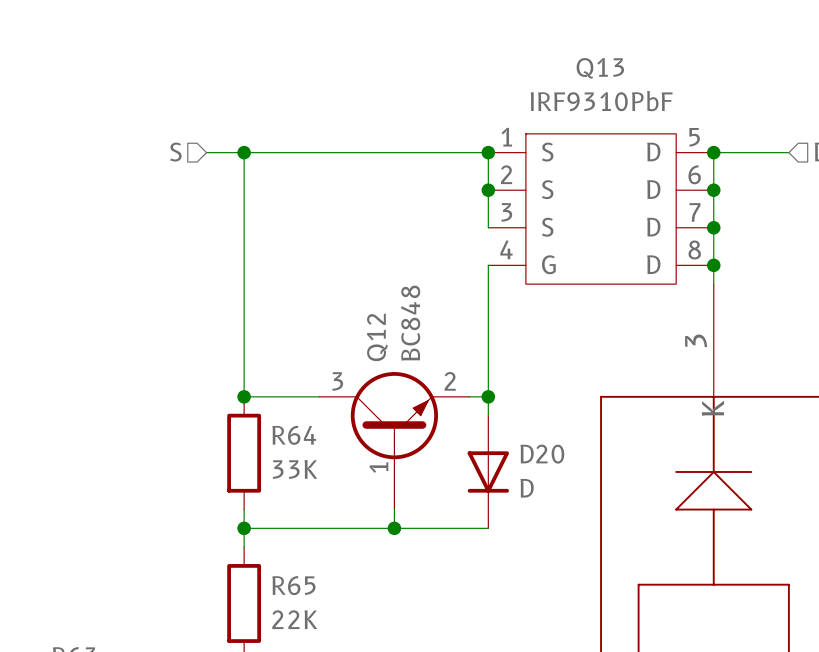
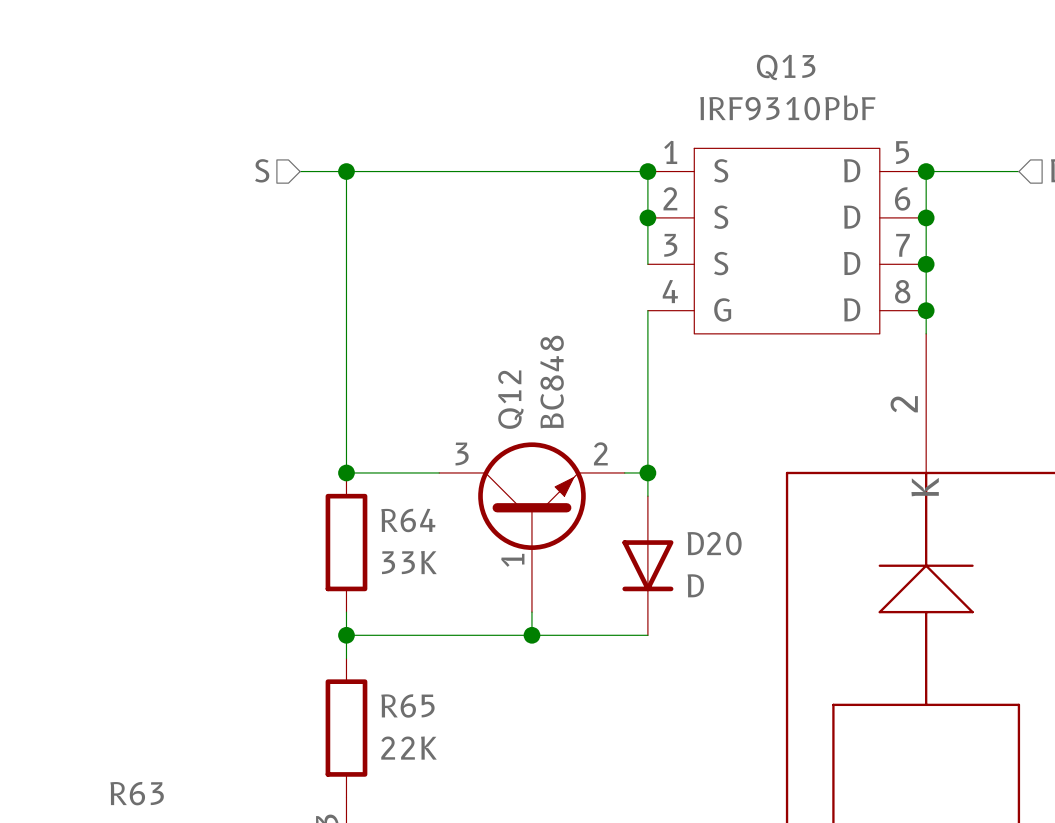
part pin number: 3 (696, 340) -> 2 (904, 404)

